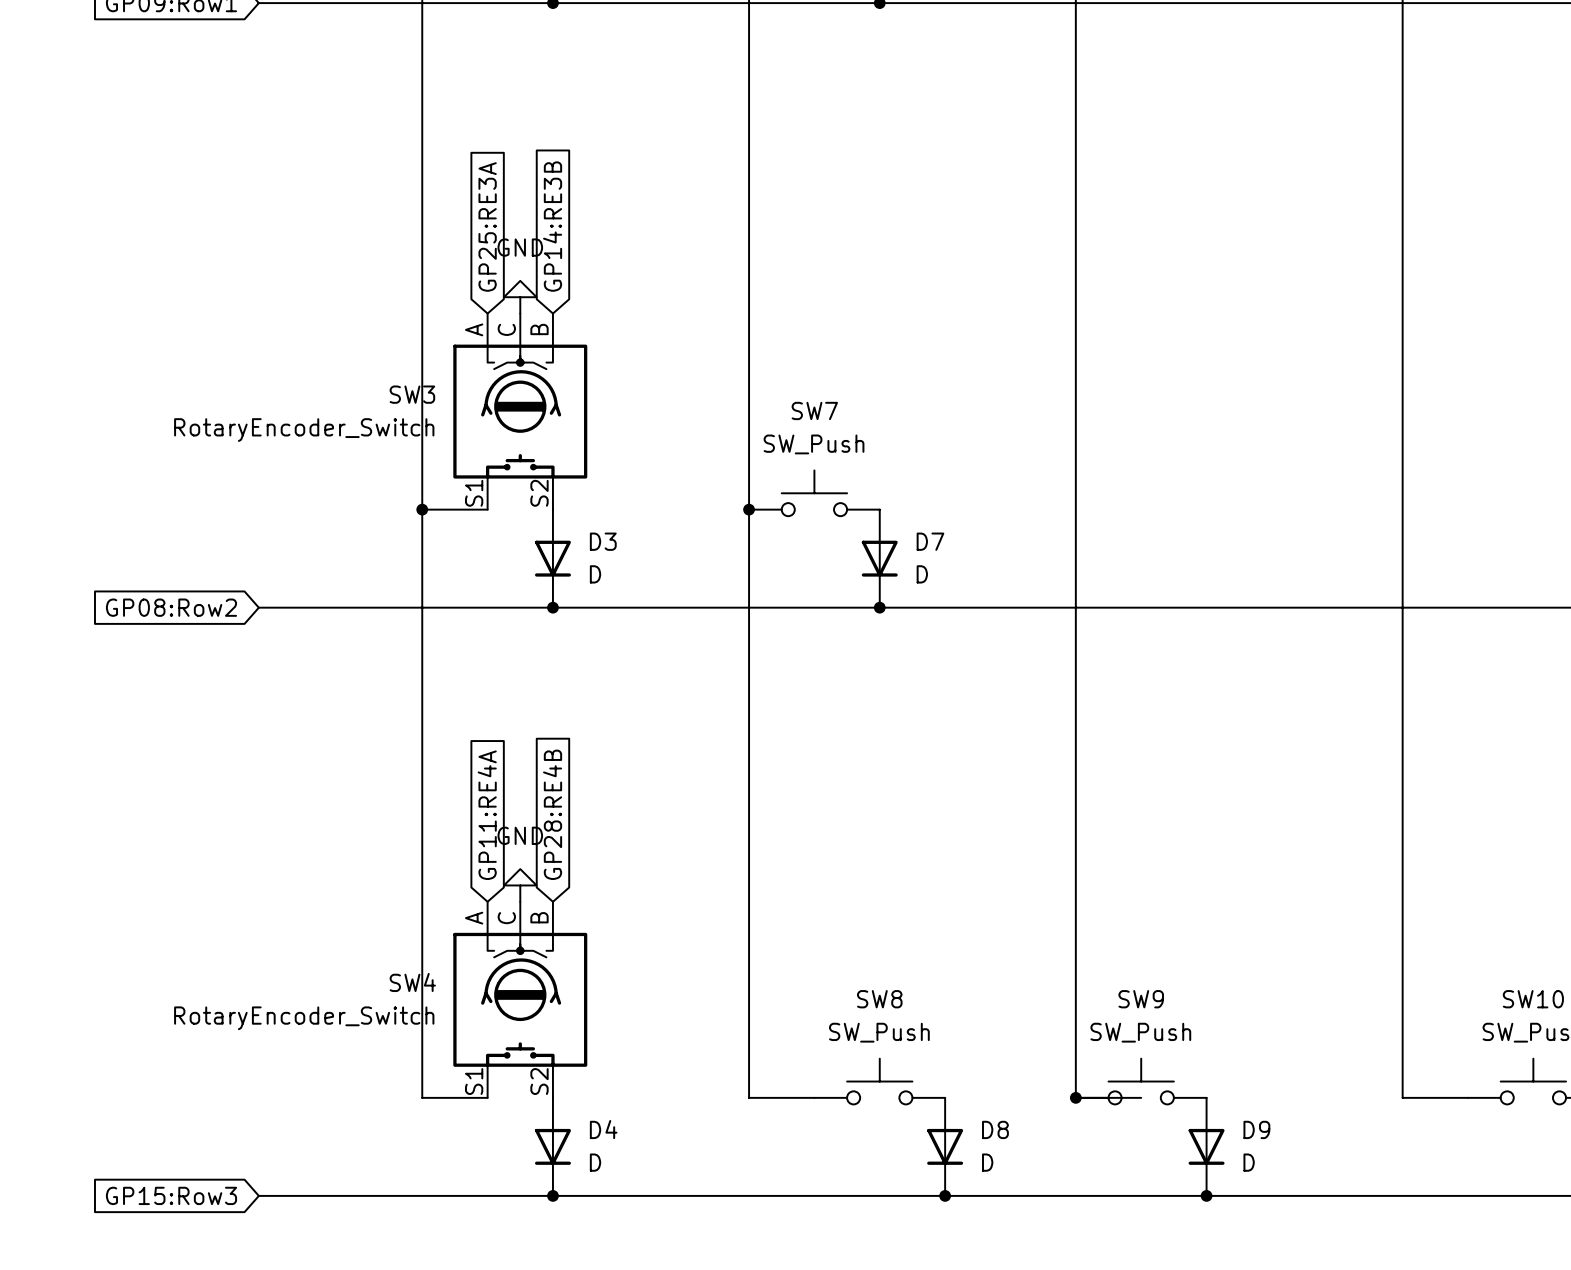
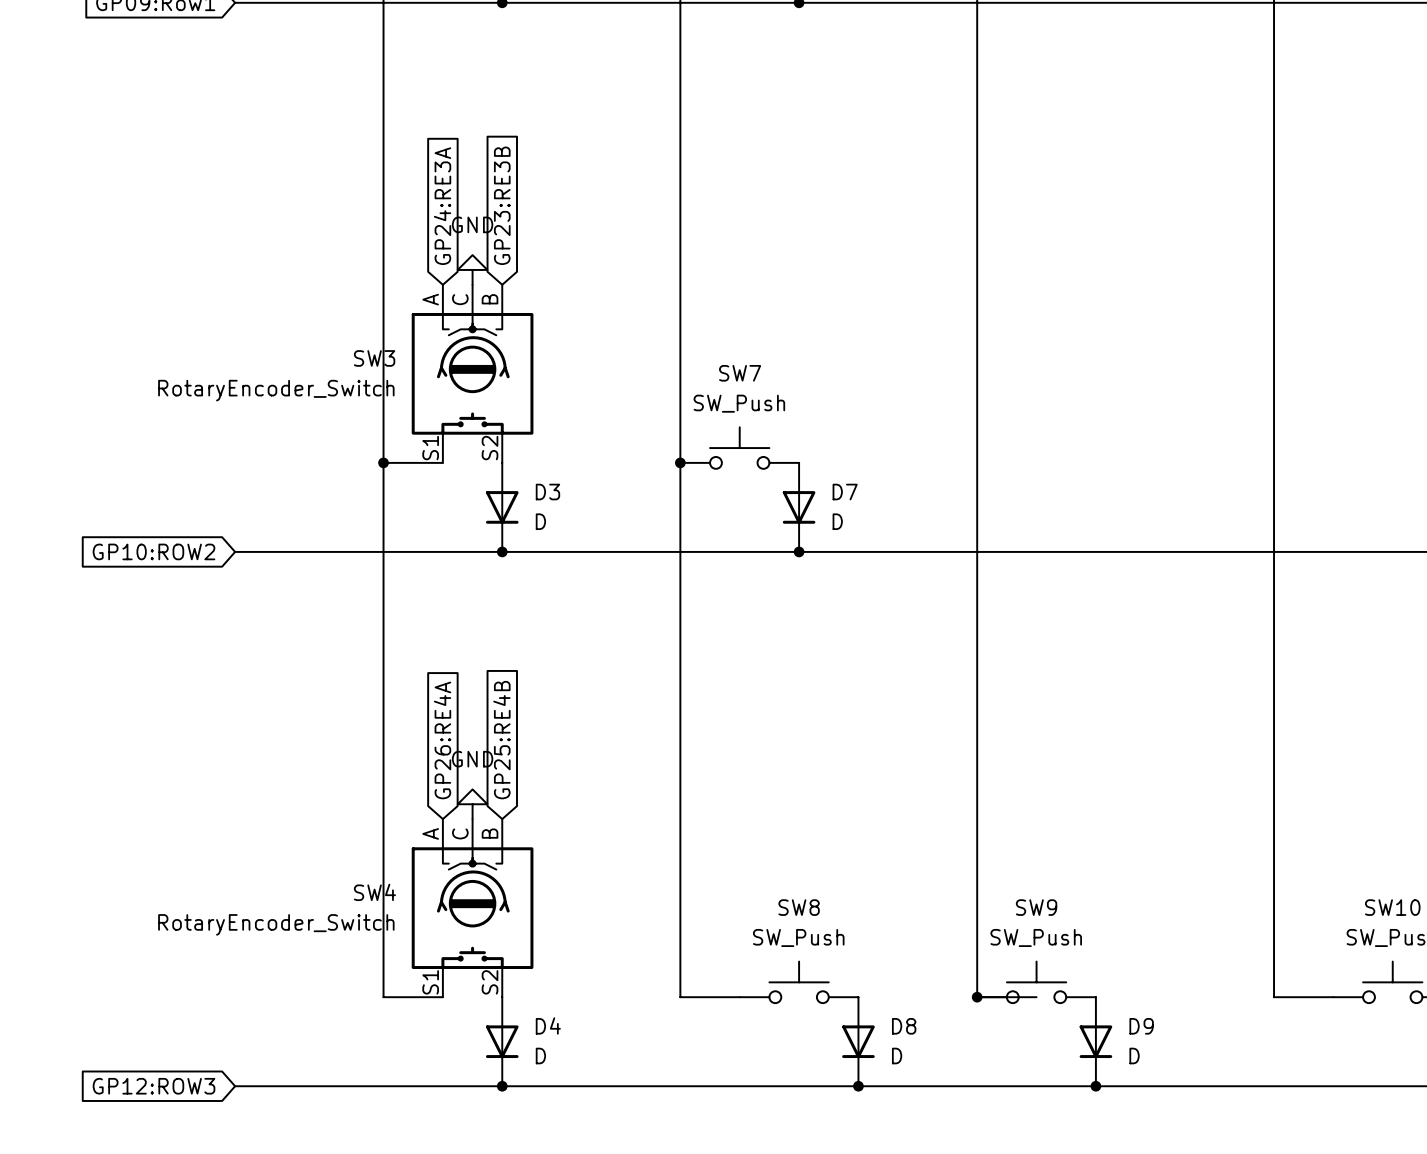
global label: GP25:RE3A (487, 226) -> GP24:RE3A (442, 206)
global label: GP14:RE3B (552, 226) -> GP23:RE3B (502, 205)
global label: GP08:Row2 (171, 607) -> GP10:ROW2 (153, 551)
global label: GP28:RE4B (552, 814) -> GP25:RE4B (501, 740)
global label: GP11:RE4A (487, 815) -> GP26:RE4A (442, 740)
global label: GP15:Row3 (171, 1195) -> GP12:ROW3 (153, 1086)

